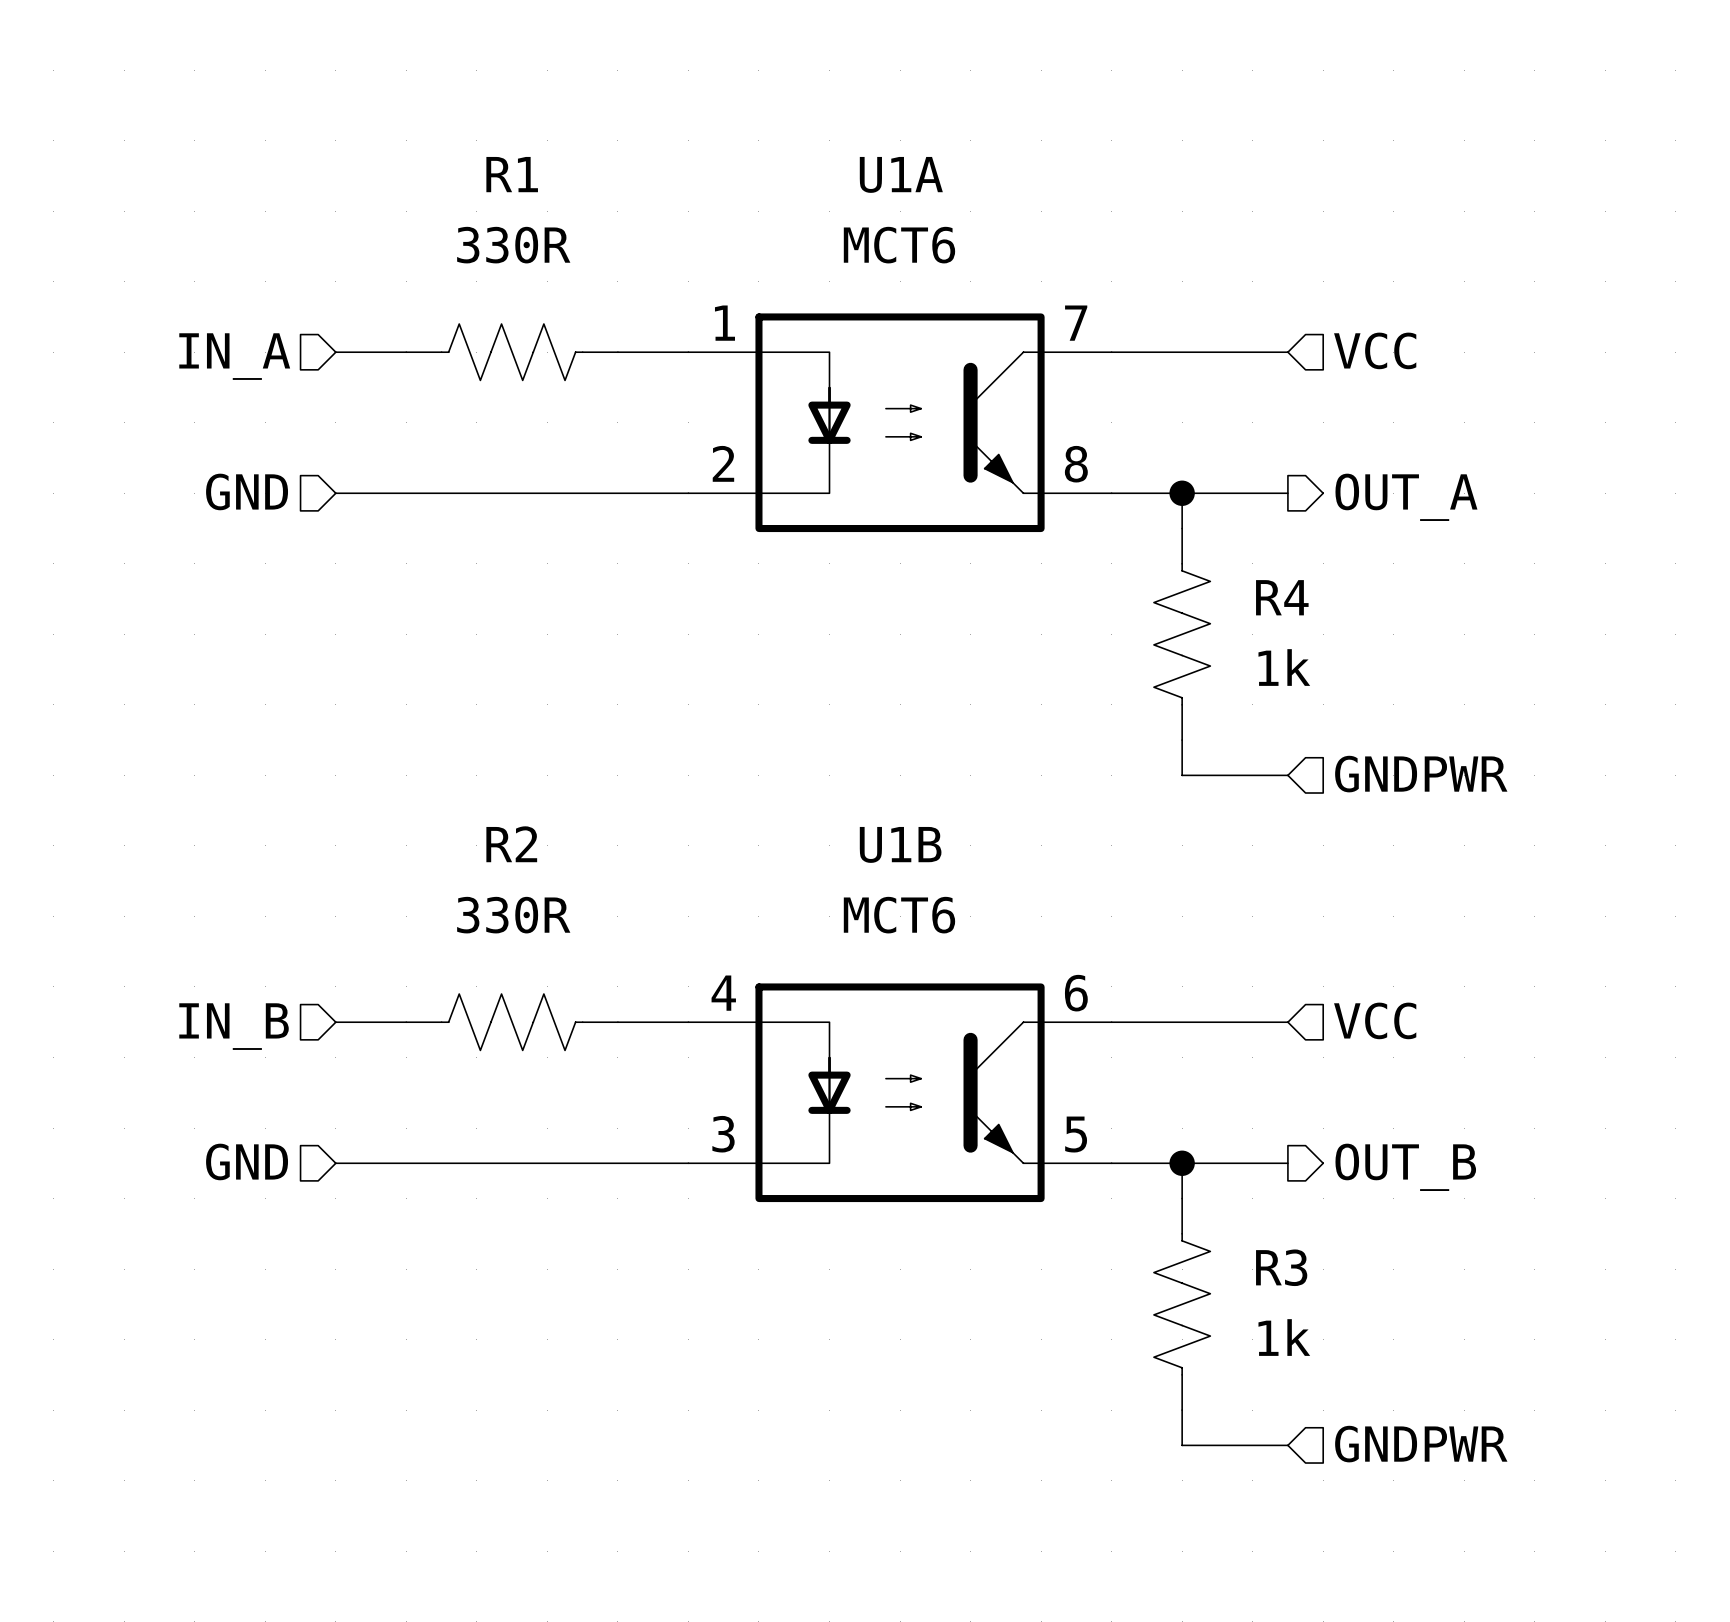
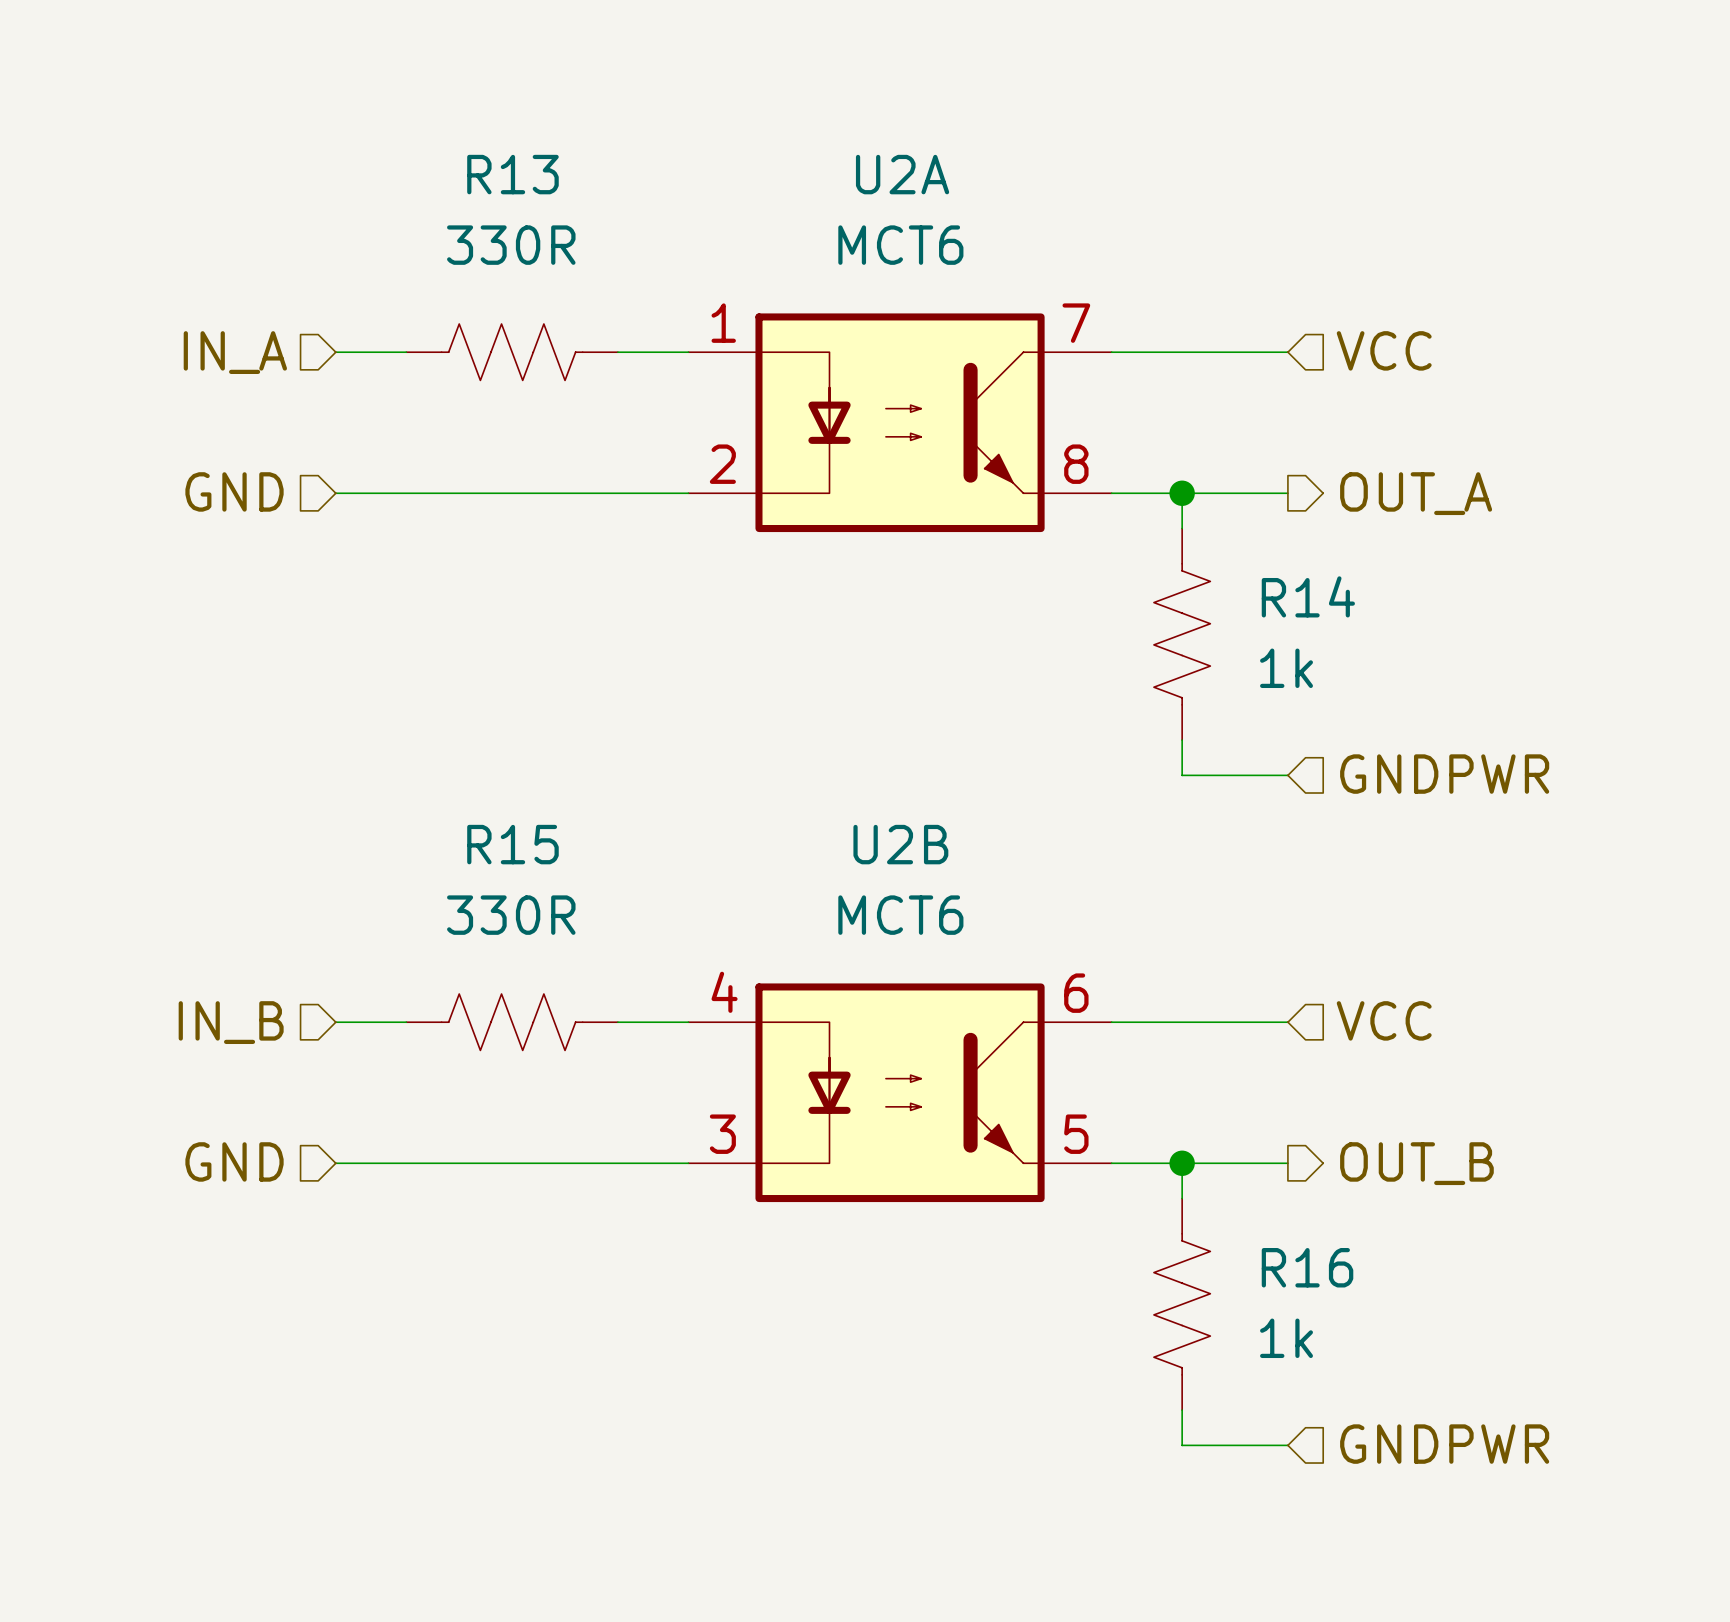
R1 name: R1 (512, 174) -> R13 (512, 174)
U1A name: U1A (901, 174) -> U2A (902, 174)
R4 name: R4 (1282, 597) -> R14 (1308, 596)
R2 name: R2 (511, 844) -> R15 (512, 844)
U1B name: U1B (900, 844) -> U2B (900, 844)
R3 name: R3 (1281, 1267) -> R16 (1307, 1267)

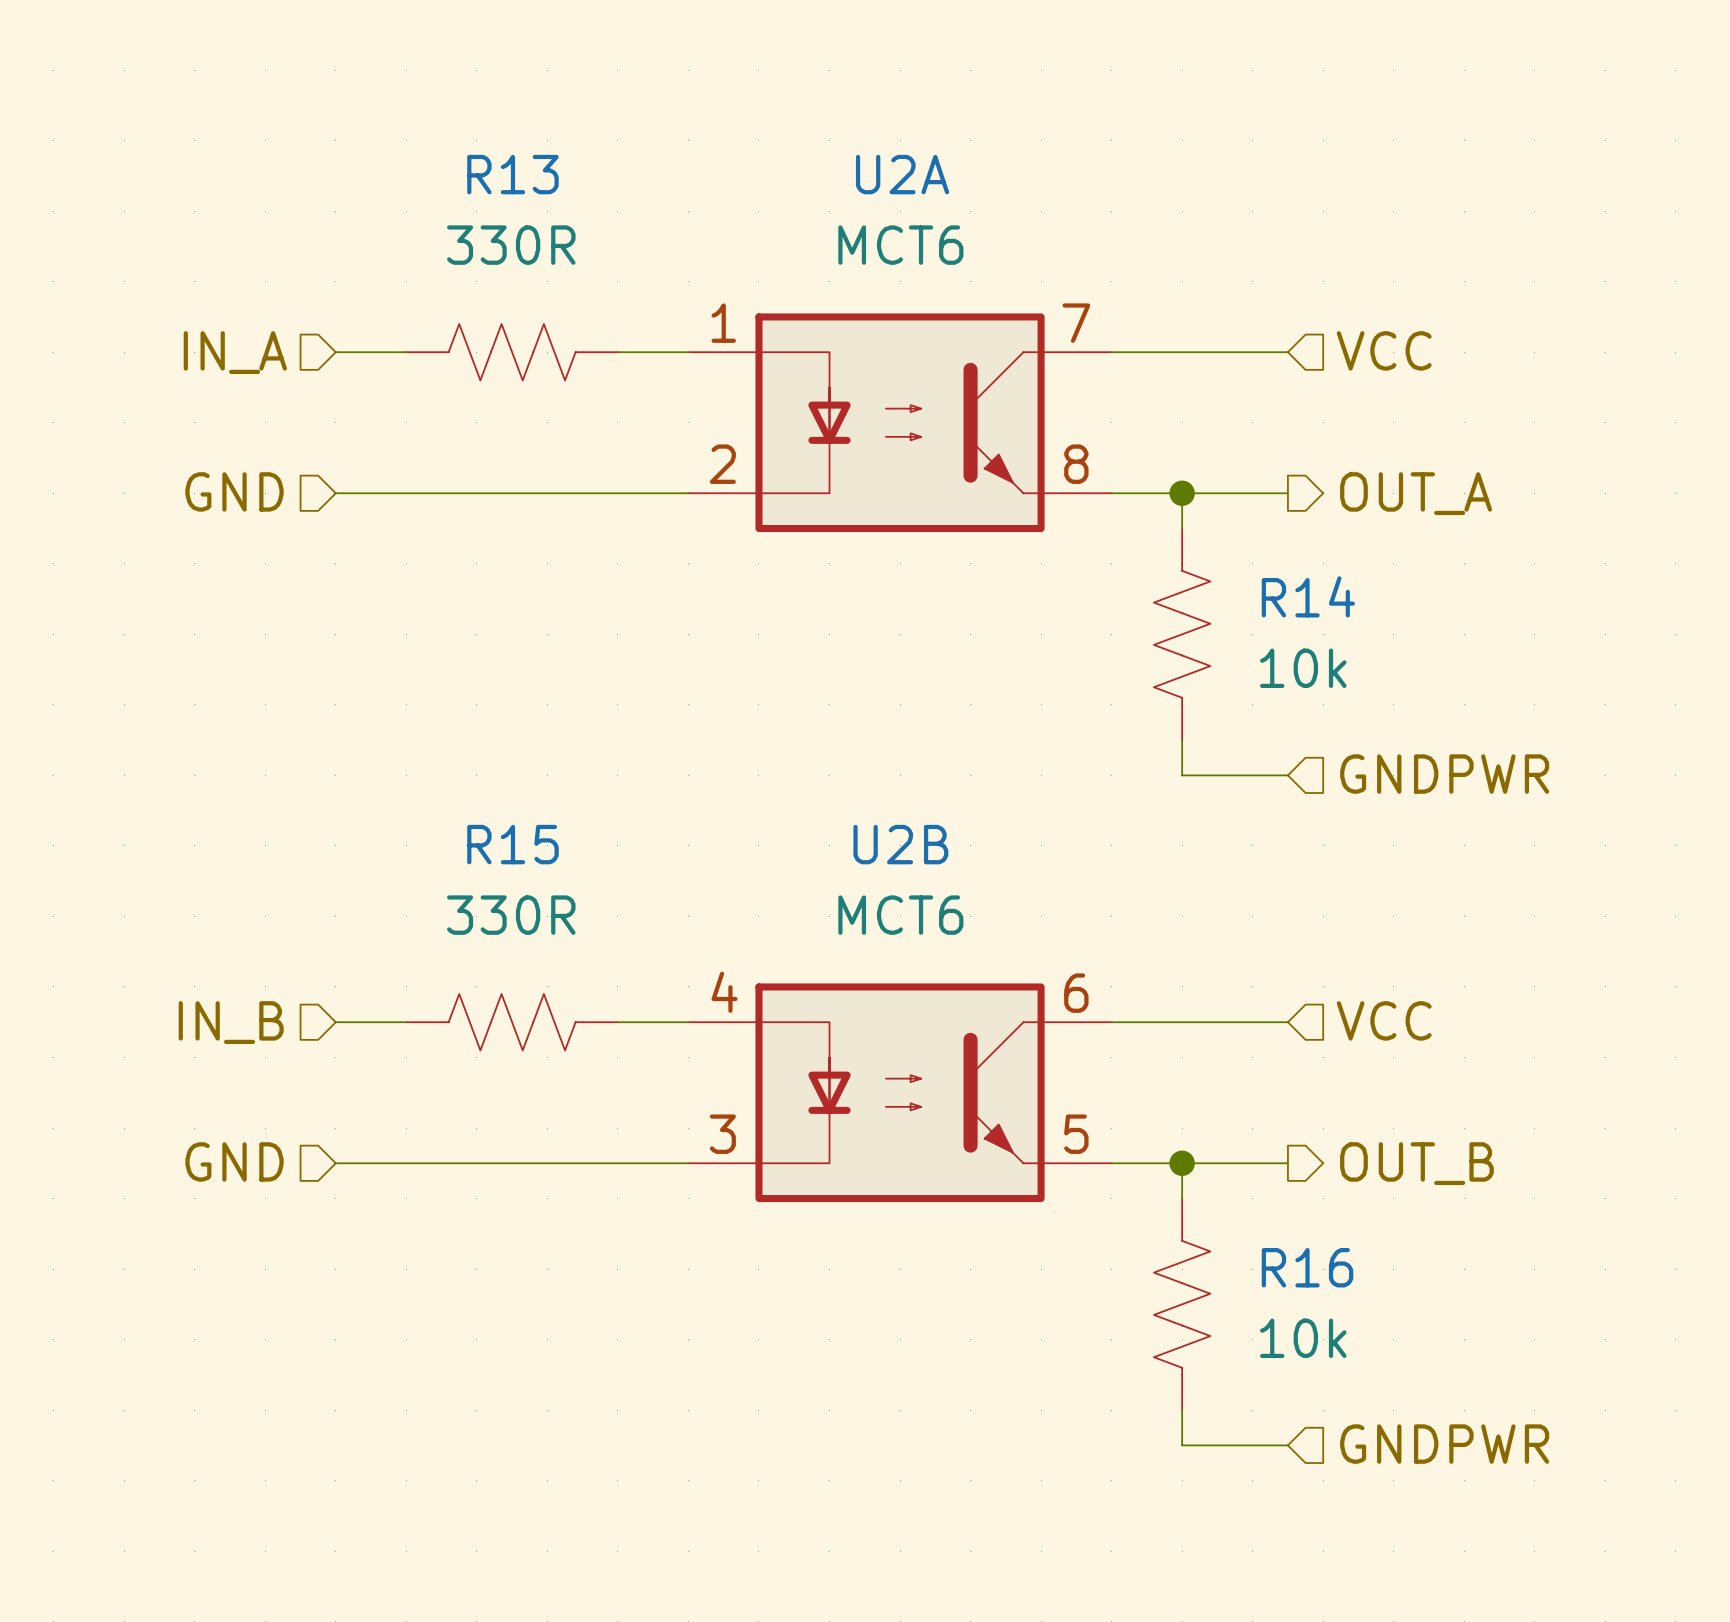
R14 value: 1k (1286, 668) -> 10k (1303, 668)
R16 value: 1k (1286, 1338) -> 10k (1303, 1338)

